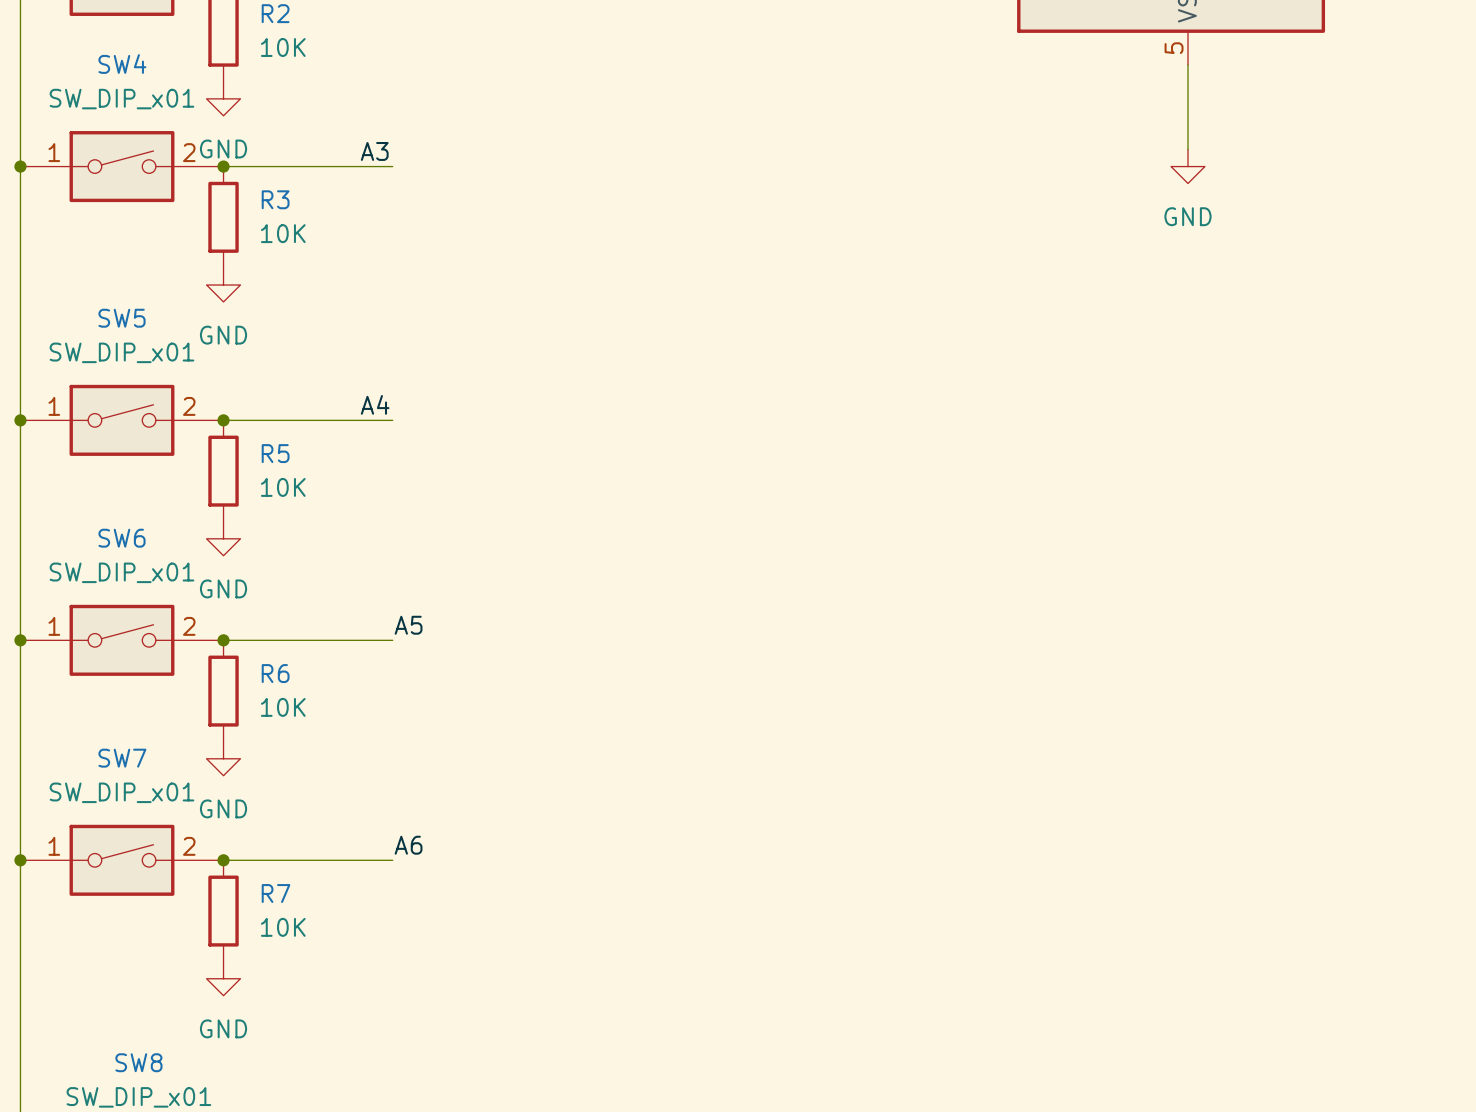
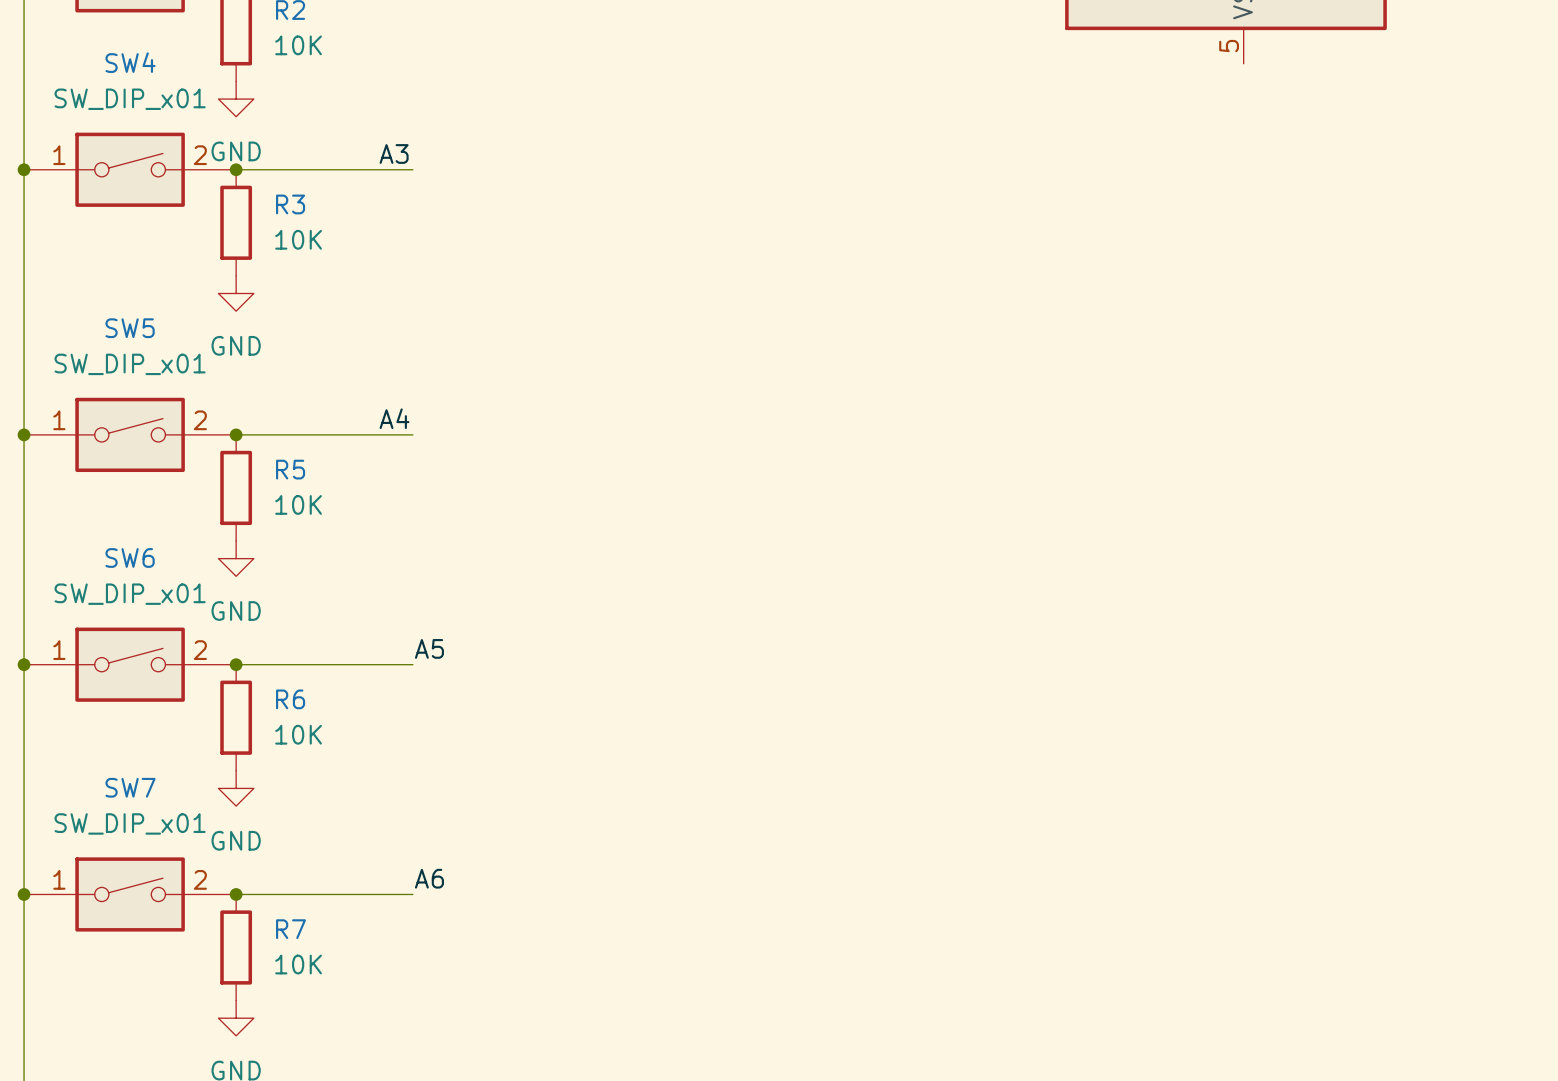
wire: (1187, 65) (1187, 149) -> none
power symbol: GND (1187, 166) -> none

